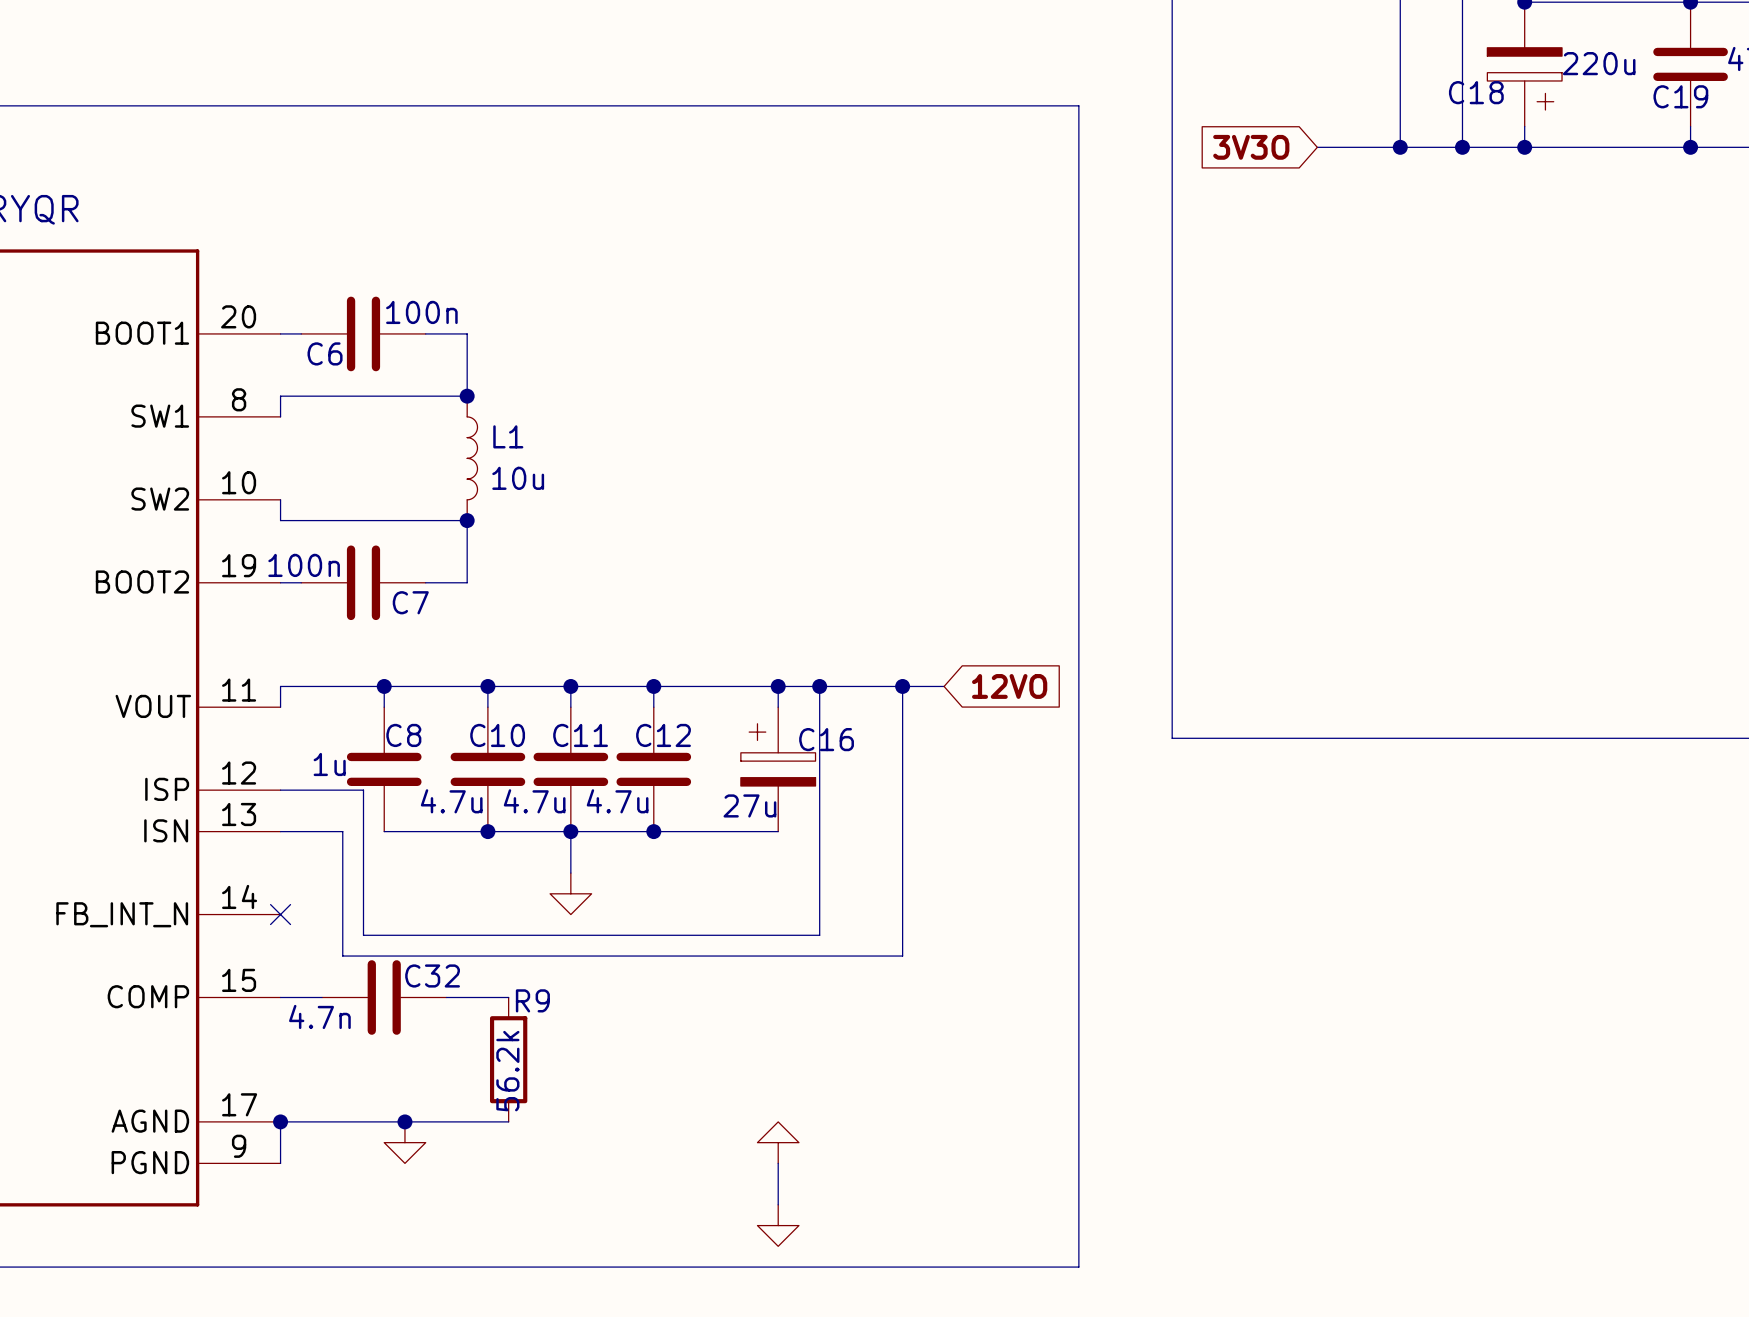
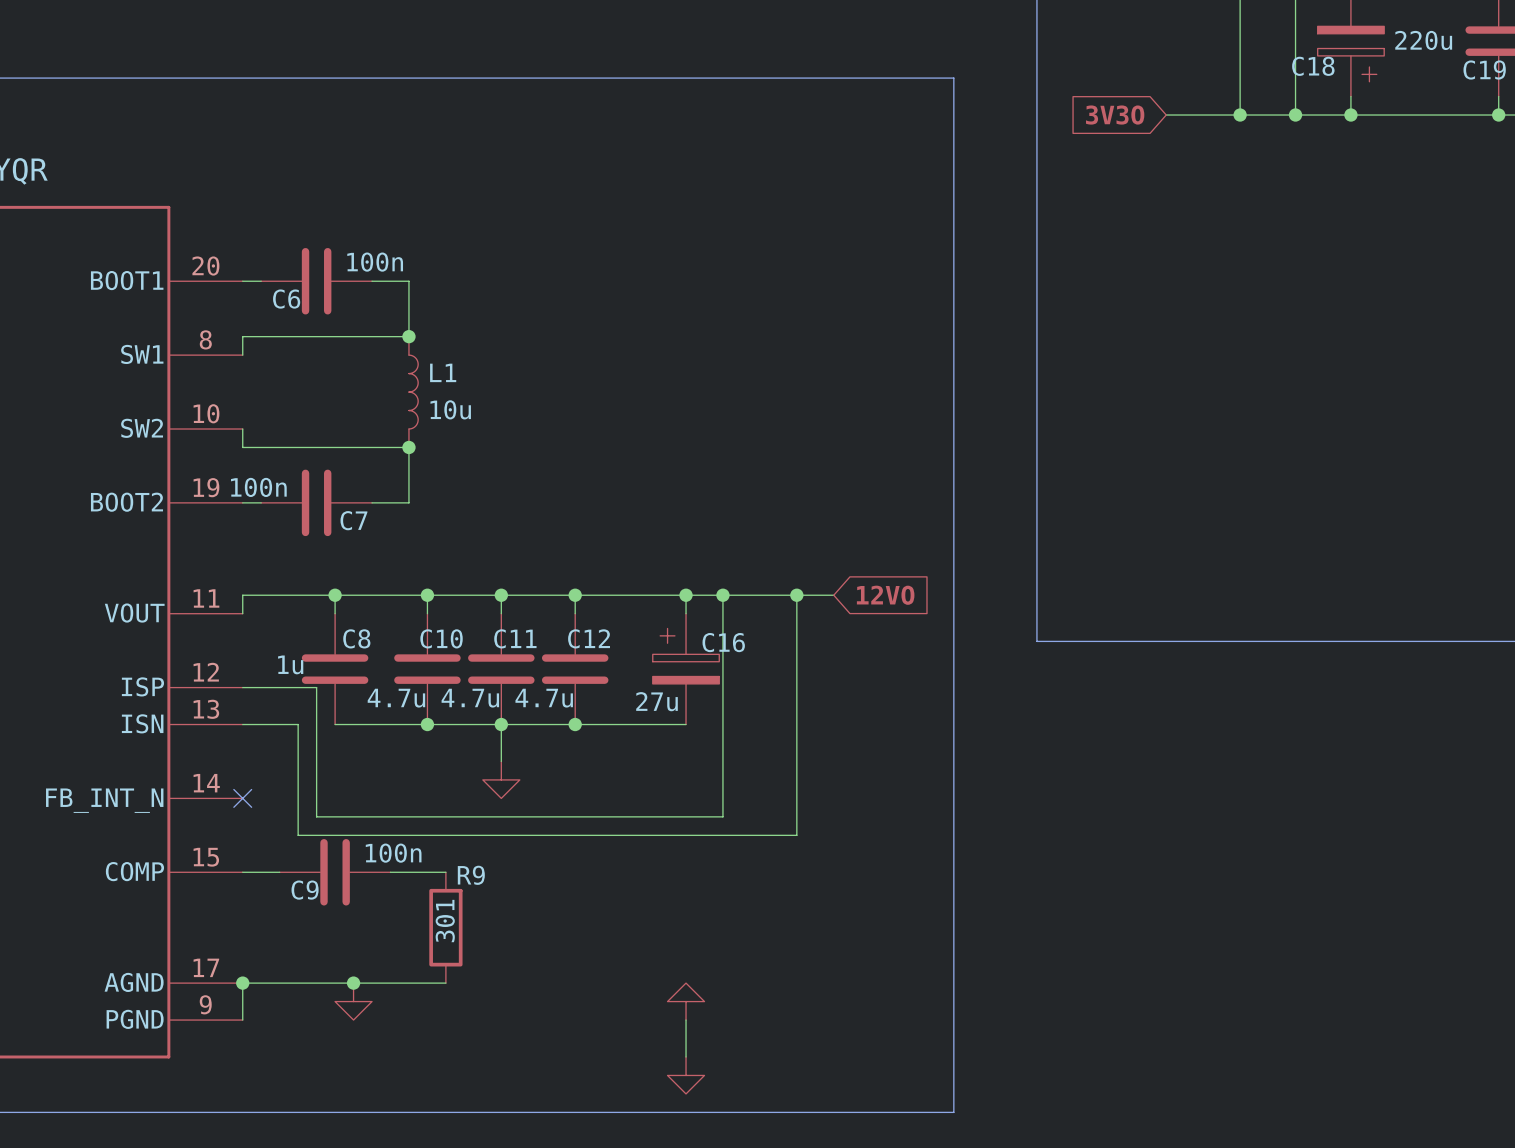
C32 name: C32 (432, 975) -> C9 (305, 890)
C32 value: 4.7n (319, 1016) -> 100n (393, 853)
R9 value: 56.2k (507, 1071) -> 301 (445, 921)

